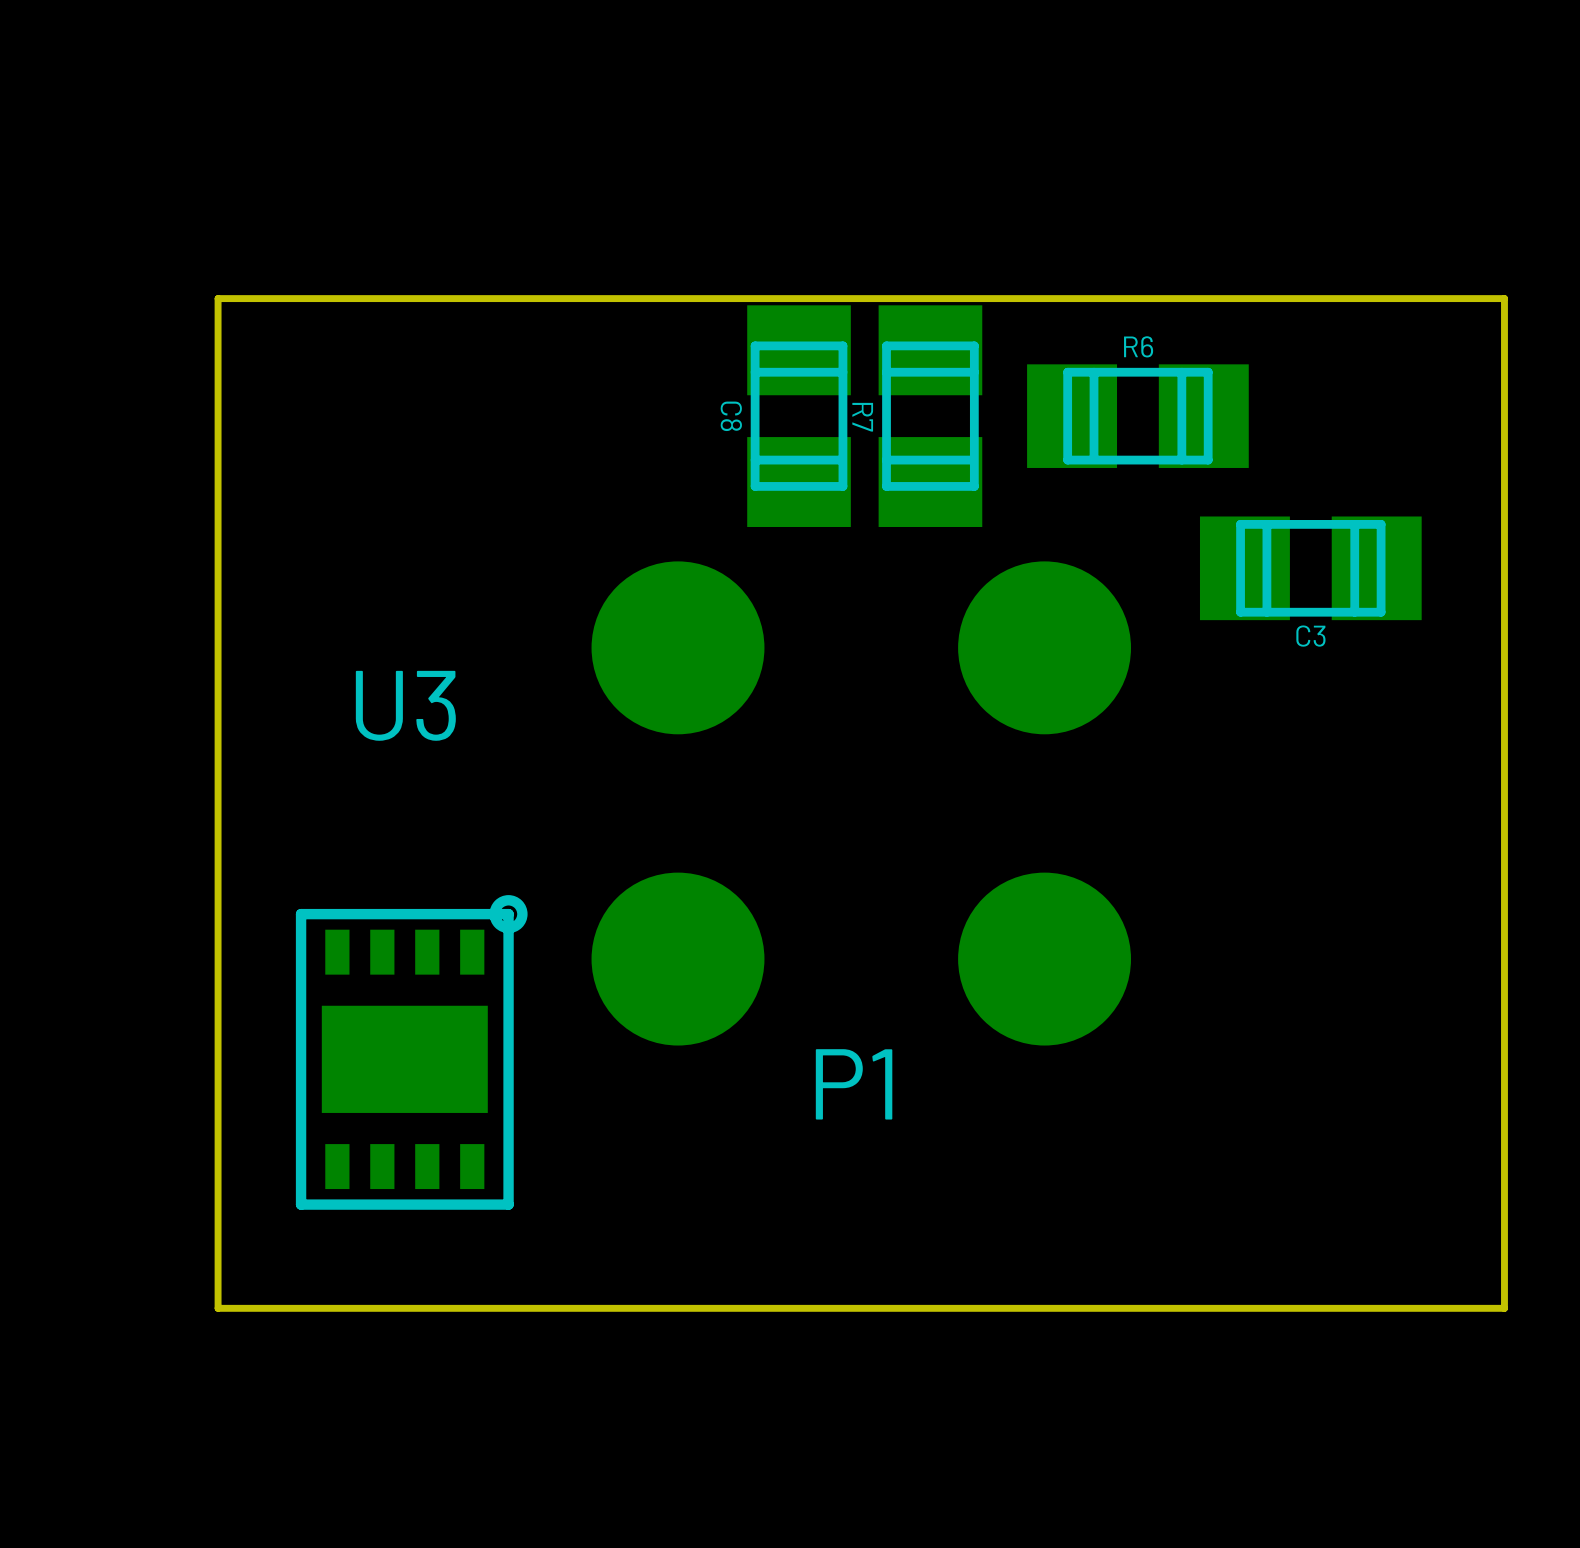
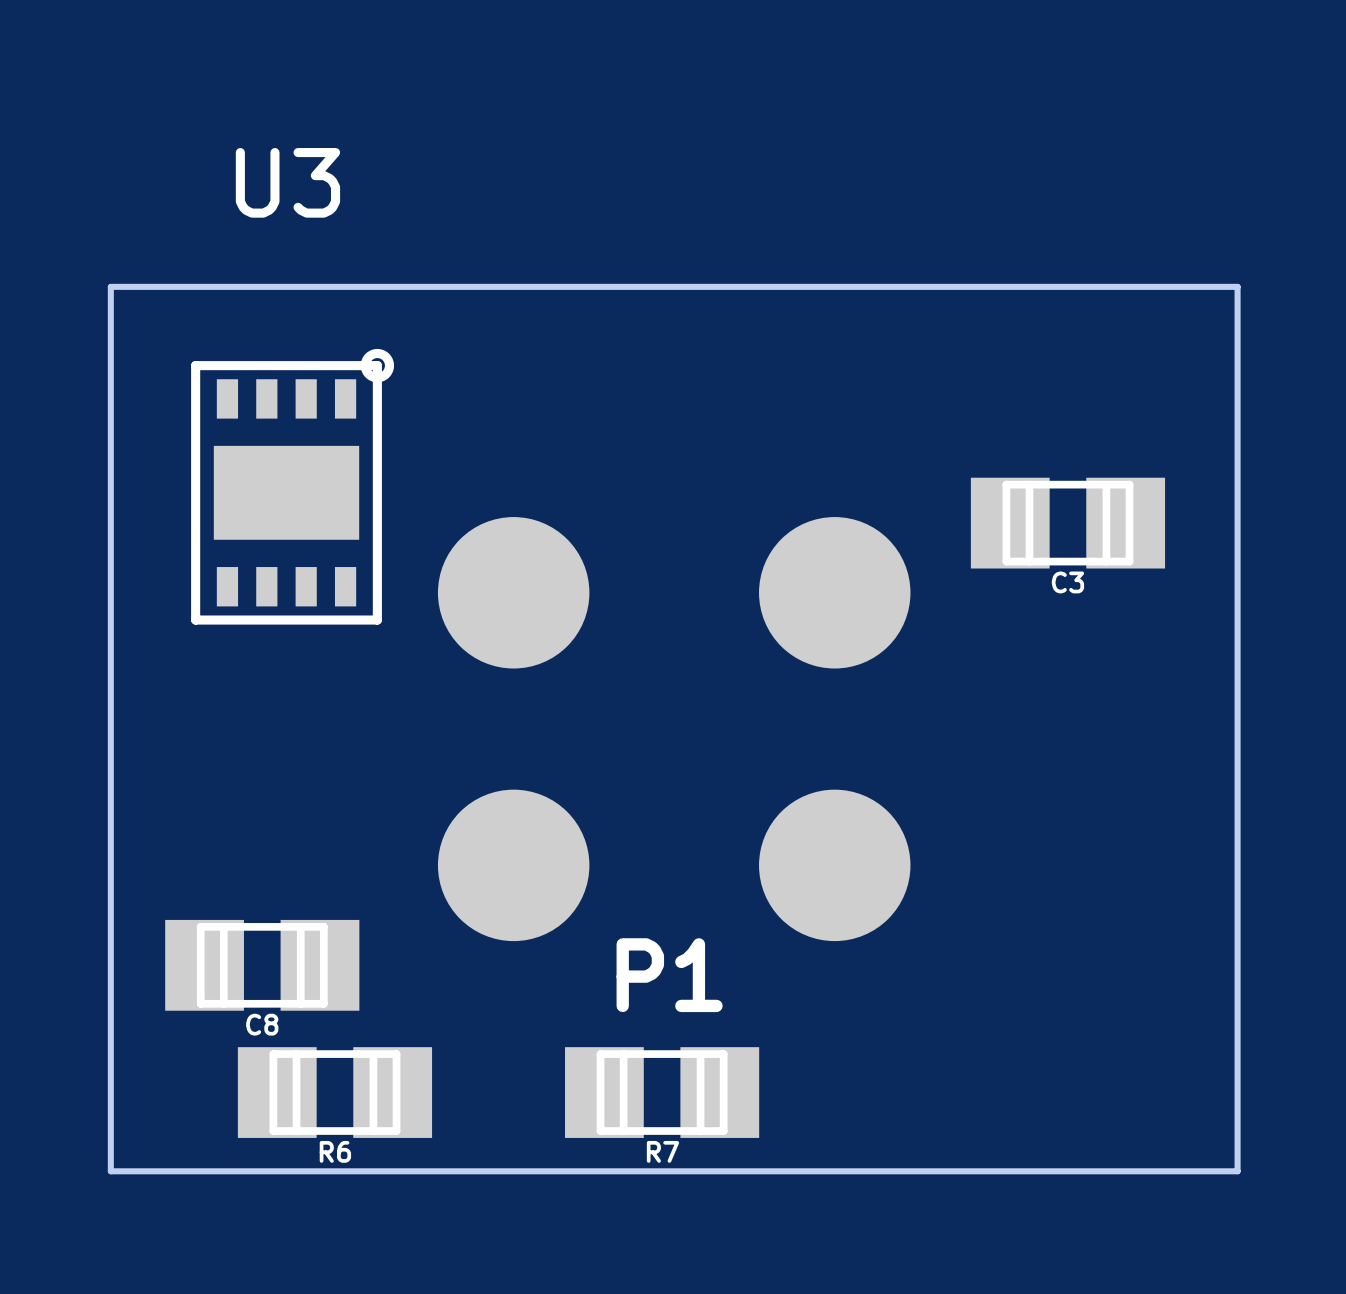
C8 rotation: 0° (799, 416) -> 90° counterclockwise (262, 965)
C8 position: (799, 416) -> (262, 965)
R7 rotation: 0° (930, 416) -> 90° counterclockwise (662, 1092)
R7 position: (930, 416) -> (662, 1092)
R6 rotation: 0° (1137, 416) -> 180° (334, 1092)
R6 position: (1137, 416) -> (334, 1092)
U3 position: (411, 1052) -> (292, 486)

